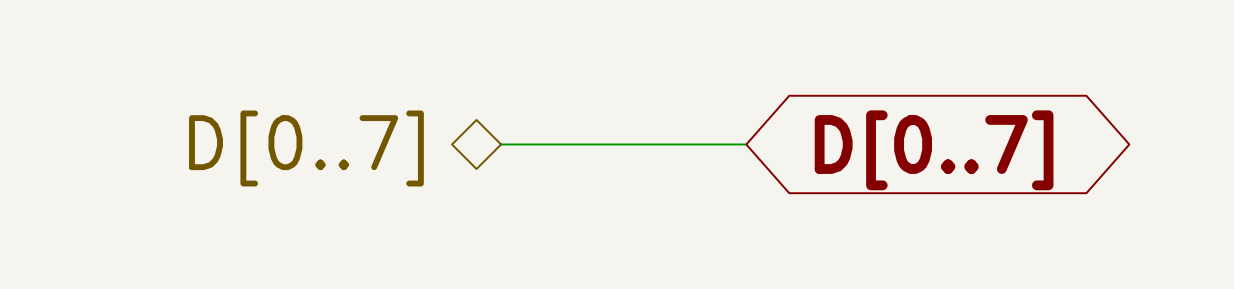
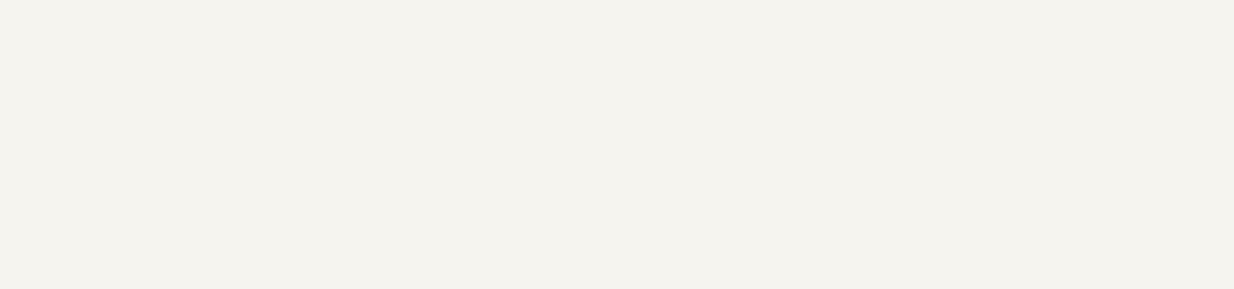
wire: (501, 144) (746, 144) -> none
hierarchical label: D[0..7] (306, 148) -> none
global label: D[0..7] (934, 150) -> none

